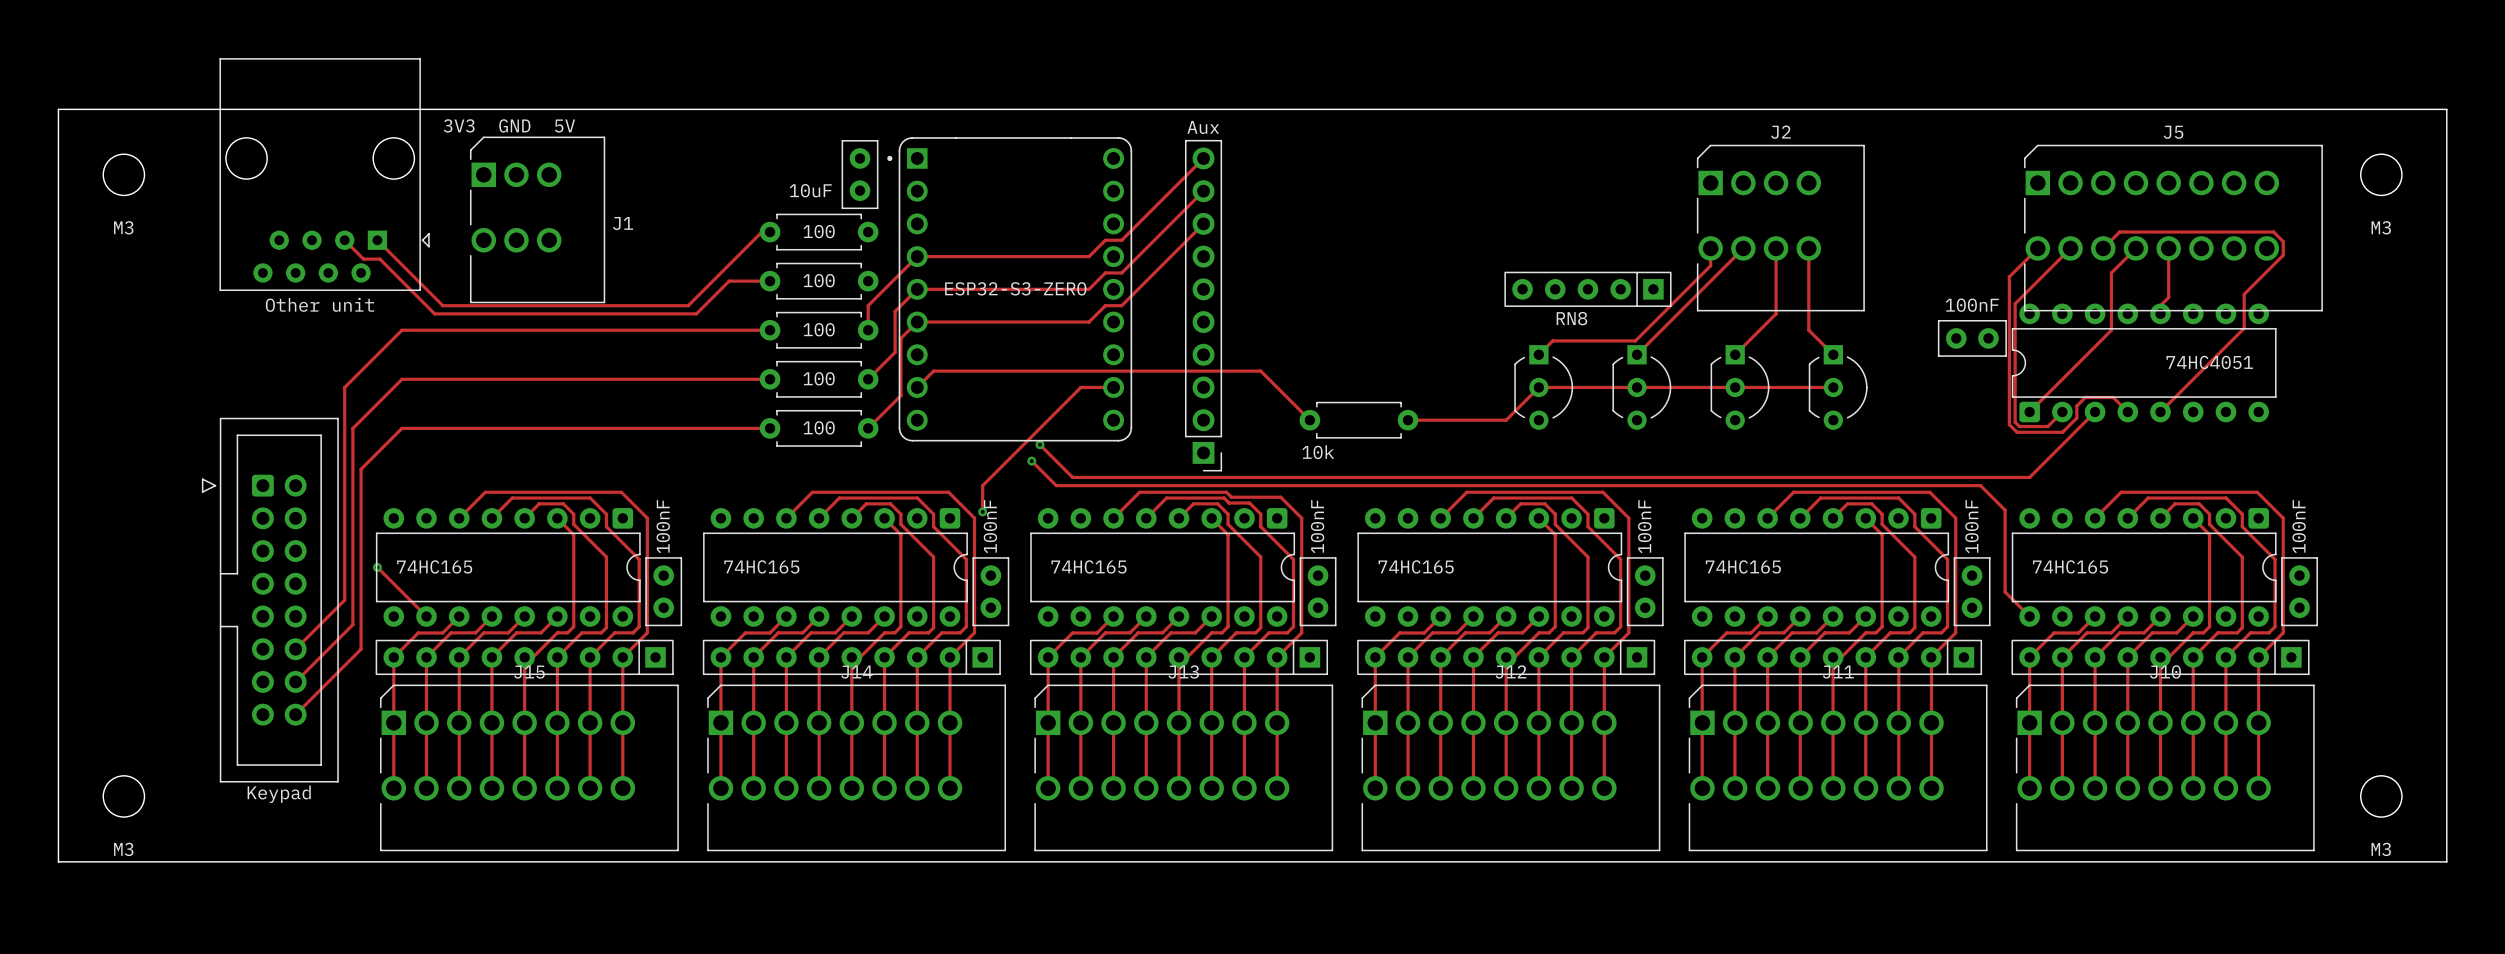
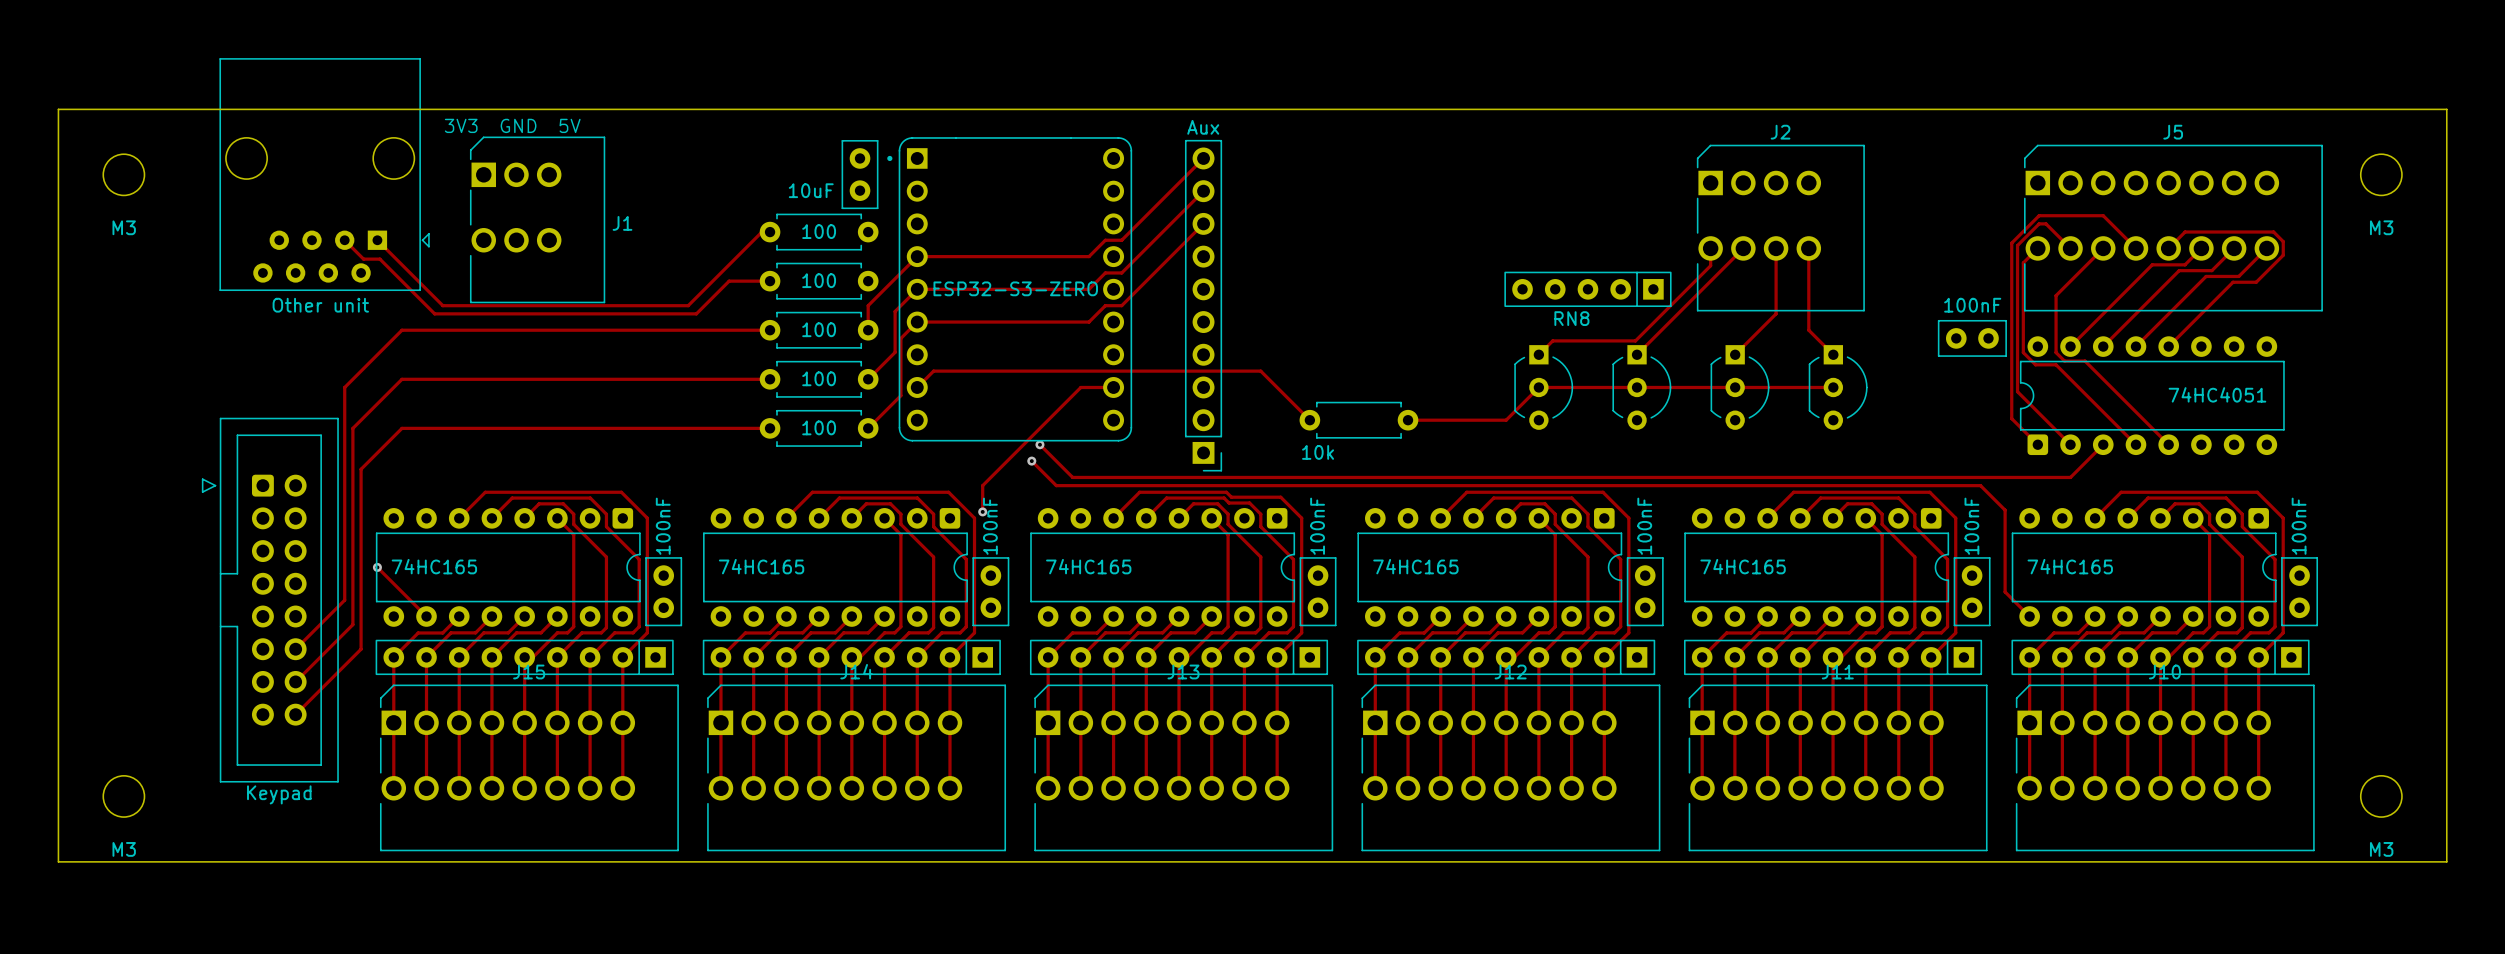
track: (2185, 232) (2119, 232) (2103, 248) -> (2185, 232) (2168, 248)
track: (2070, 248) (2015, 303) (2015, 422) (2019, 426) (2047, 426) (2062, 412) -> (2070, 248) (2046, 223) (2039, 223) (2017, 245) (2017, 391) (2070, 444)
track: none -> (2103, 248) (2056, 295) (2056, 352) (2064, 361) (2085, 361) (2168, 444)
track: (2135, 248) (2111, 272) (2111, 330) (2029, 412) -> (2135, 248) (2103, 215) (2039, 215) (2011, 243) (2011, 418) (2037, 444)
track: (2168, 248) (2168, 297) (2160, 305) (2160, 313) -> none
track: none -> (2201, 248) (2184, 264) (2152, 264) (2070, 346)
track: none -> (2234, 248) (2211, 270) (2179, 270) (2103, 346)
track: none -> (2266, 248) (2238, 276) (2206, 276) (2135, 346)
track: (2023, 262) (2009, 276) (2009, 424) (2017, 432) (2062, 432) (2076, 418) (2076, 406) (2085, 397) (2113, 397) (2127, 412) -> (2023, 262) (2023, 352) (2035, 364) (2056, 364) (2135, 444)
track: (2256, 282) (2244, 294) (2244, 328) (2160, 412) -> (2256, 282) (2233, 282) (2168, 346)
part position: (2144, 362) -> (2152, 395)
track: (2095, 412) (2029, 477) -> (2103, 444) (2070, 477) (2029, 477)

